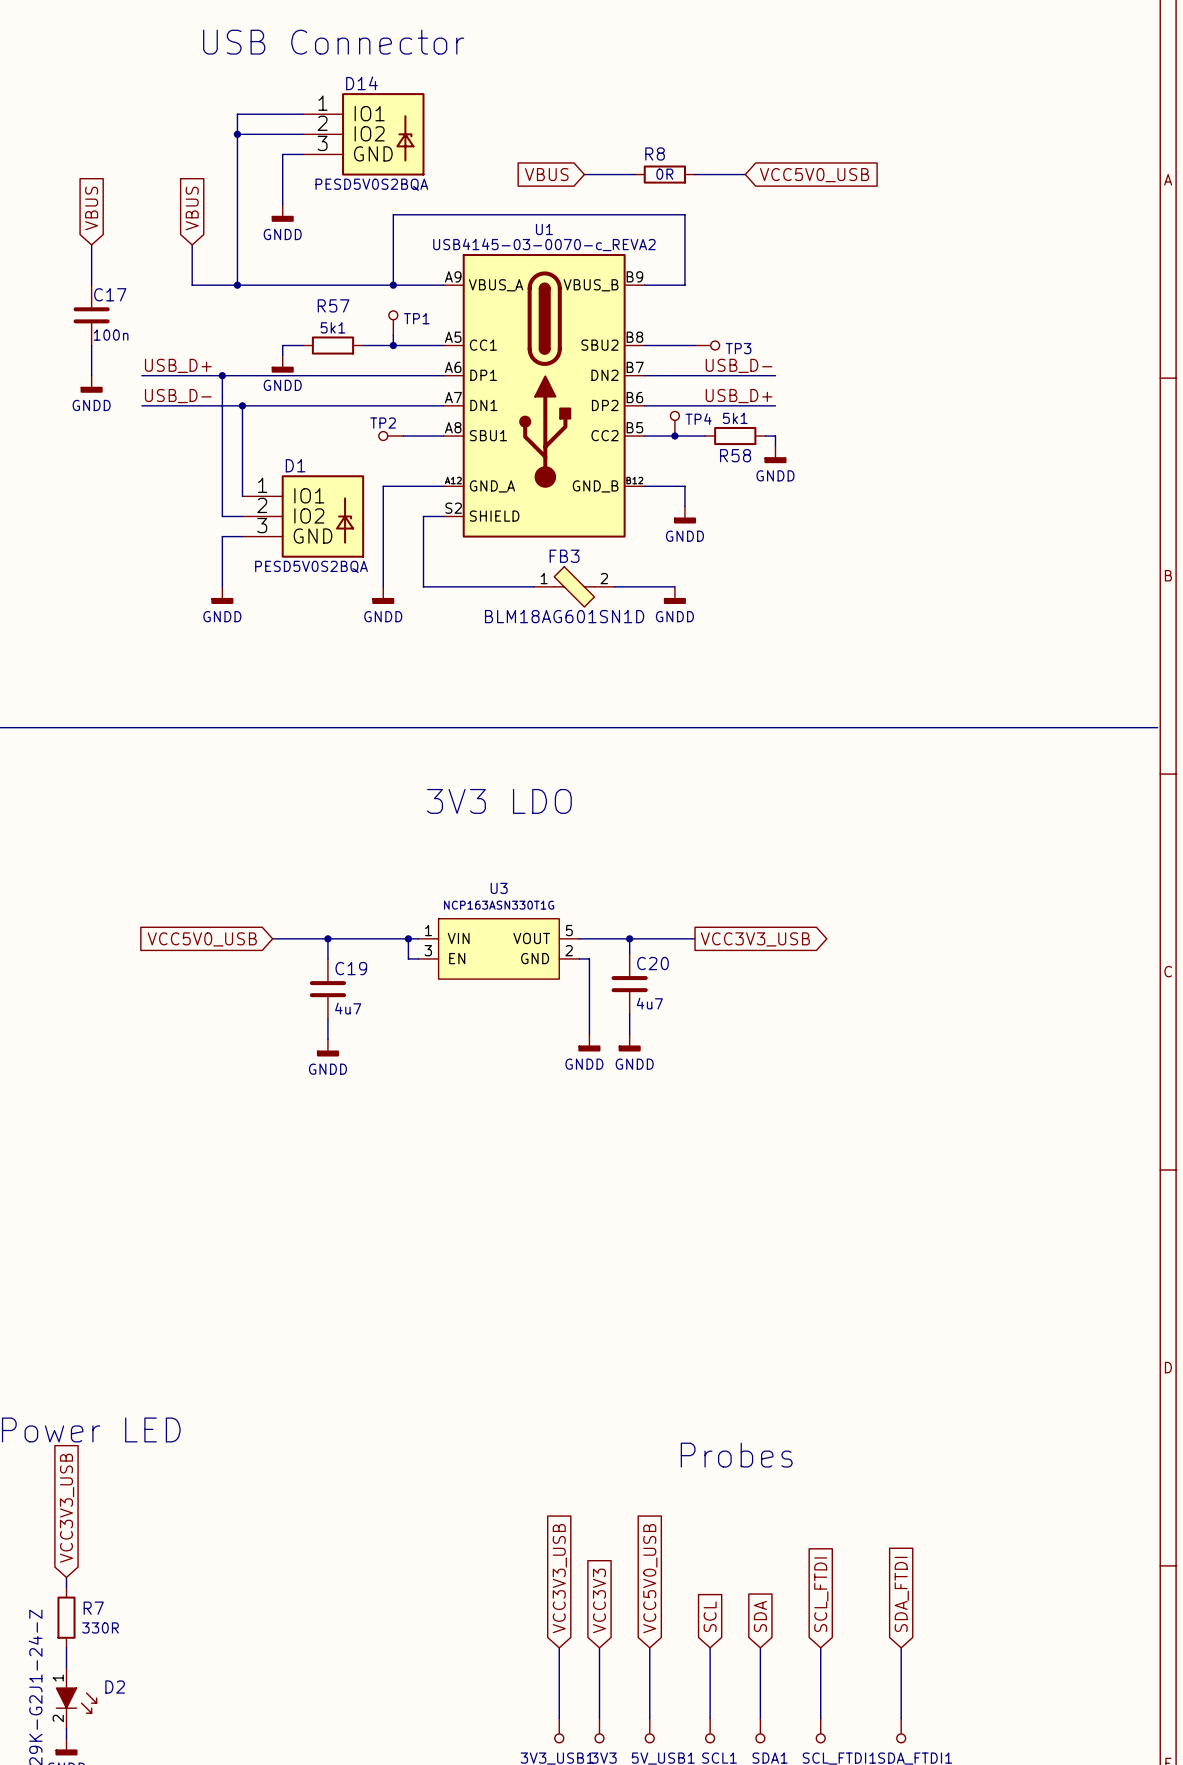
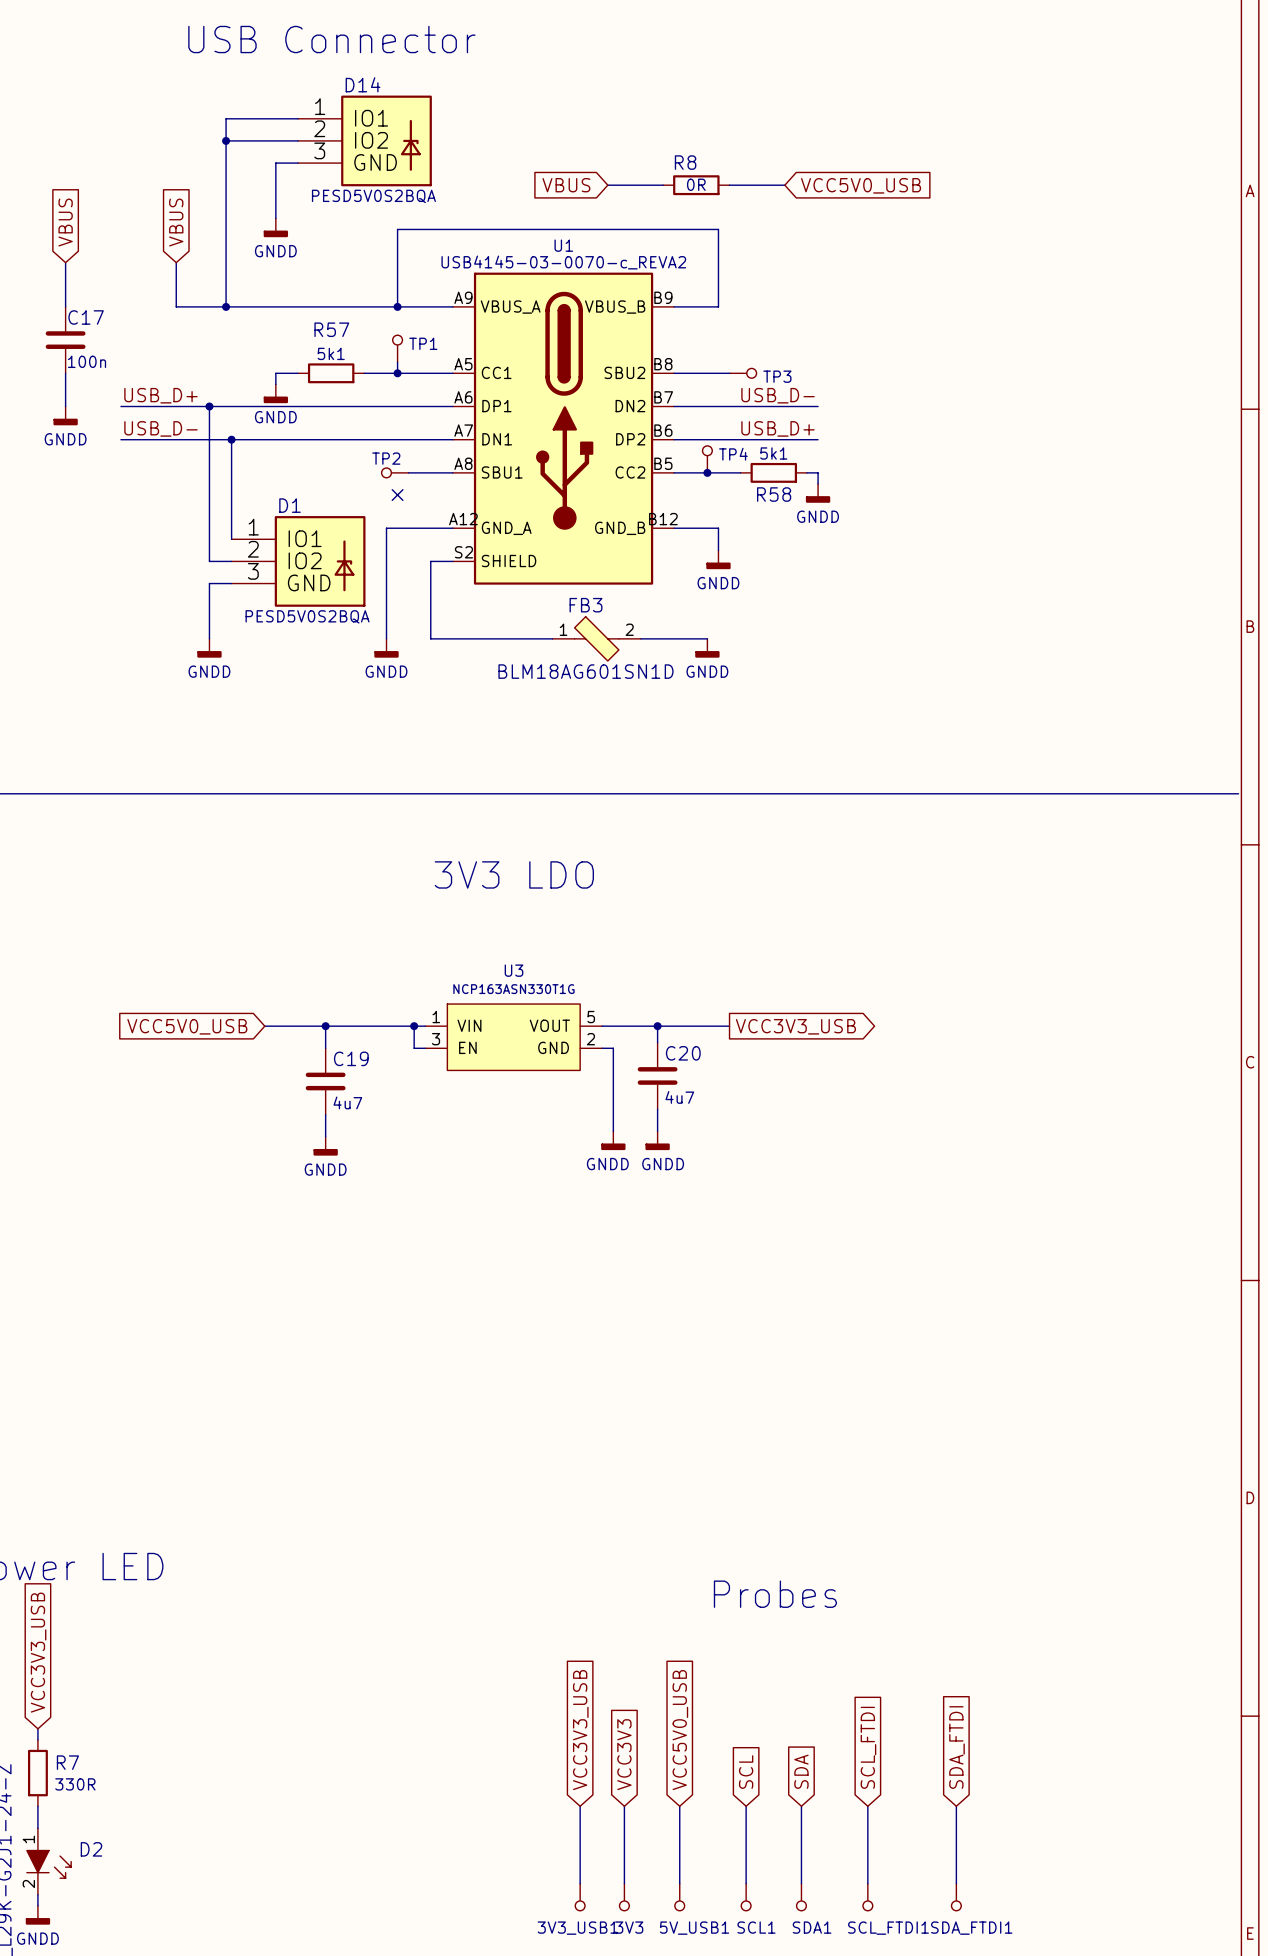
U1 symbol: [443, 253, 645, 538] -> [452, 272, 675, 585]
no-connect mark: none -> (397, 495)

